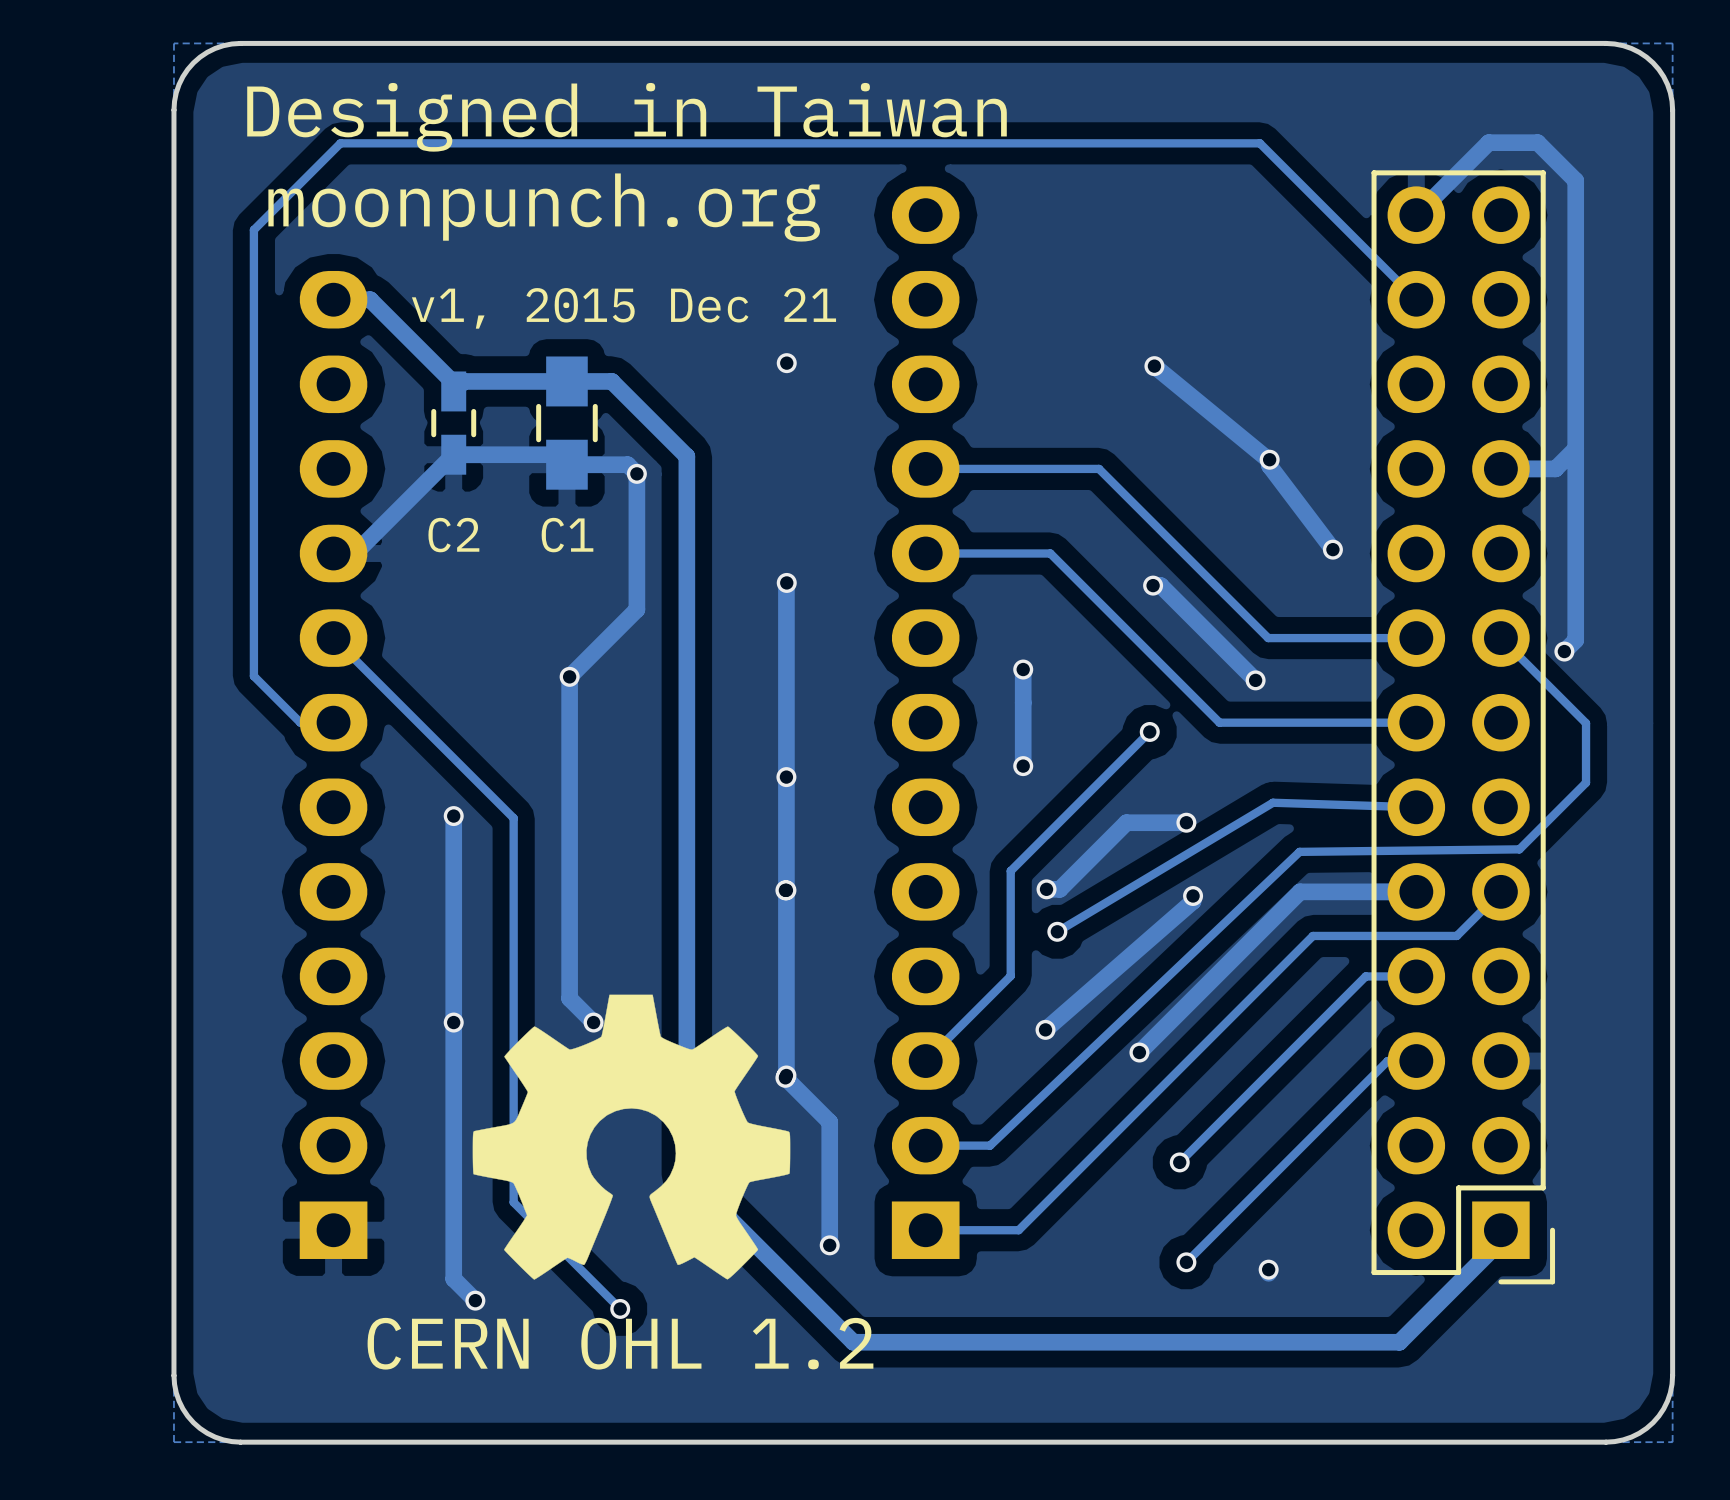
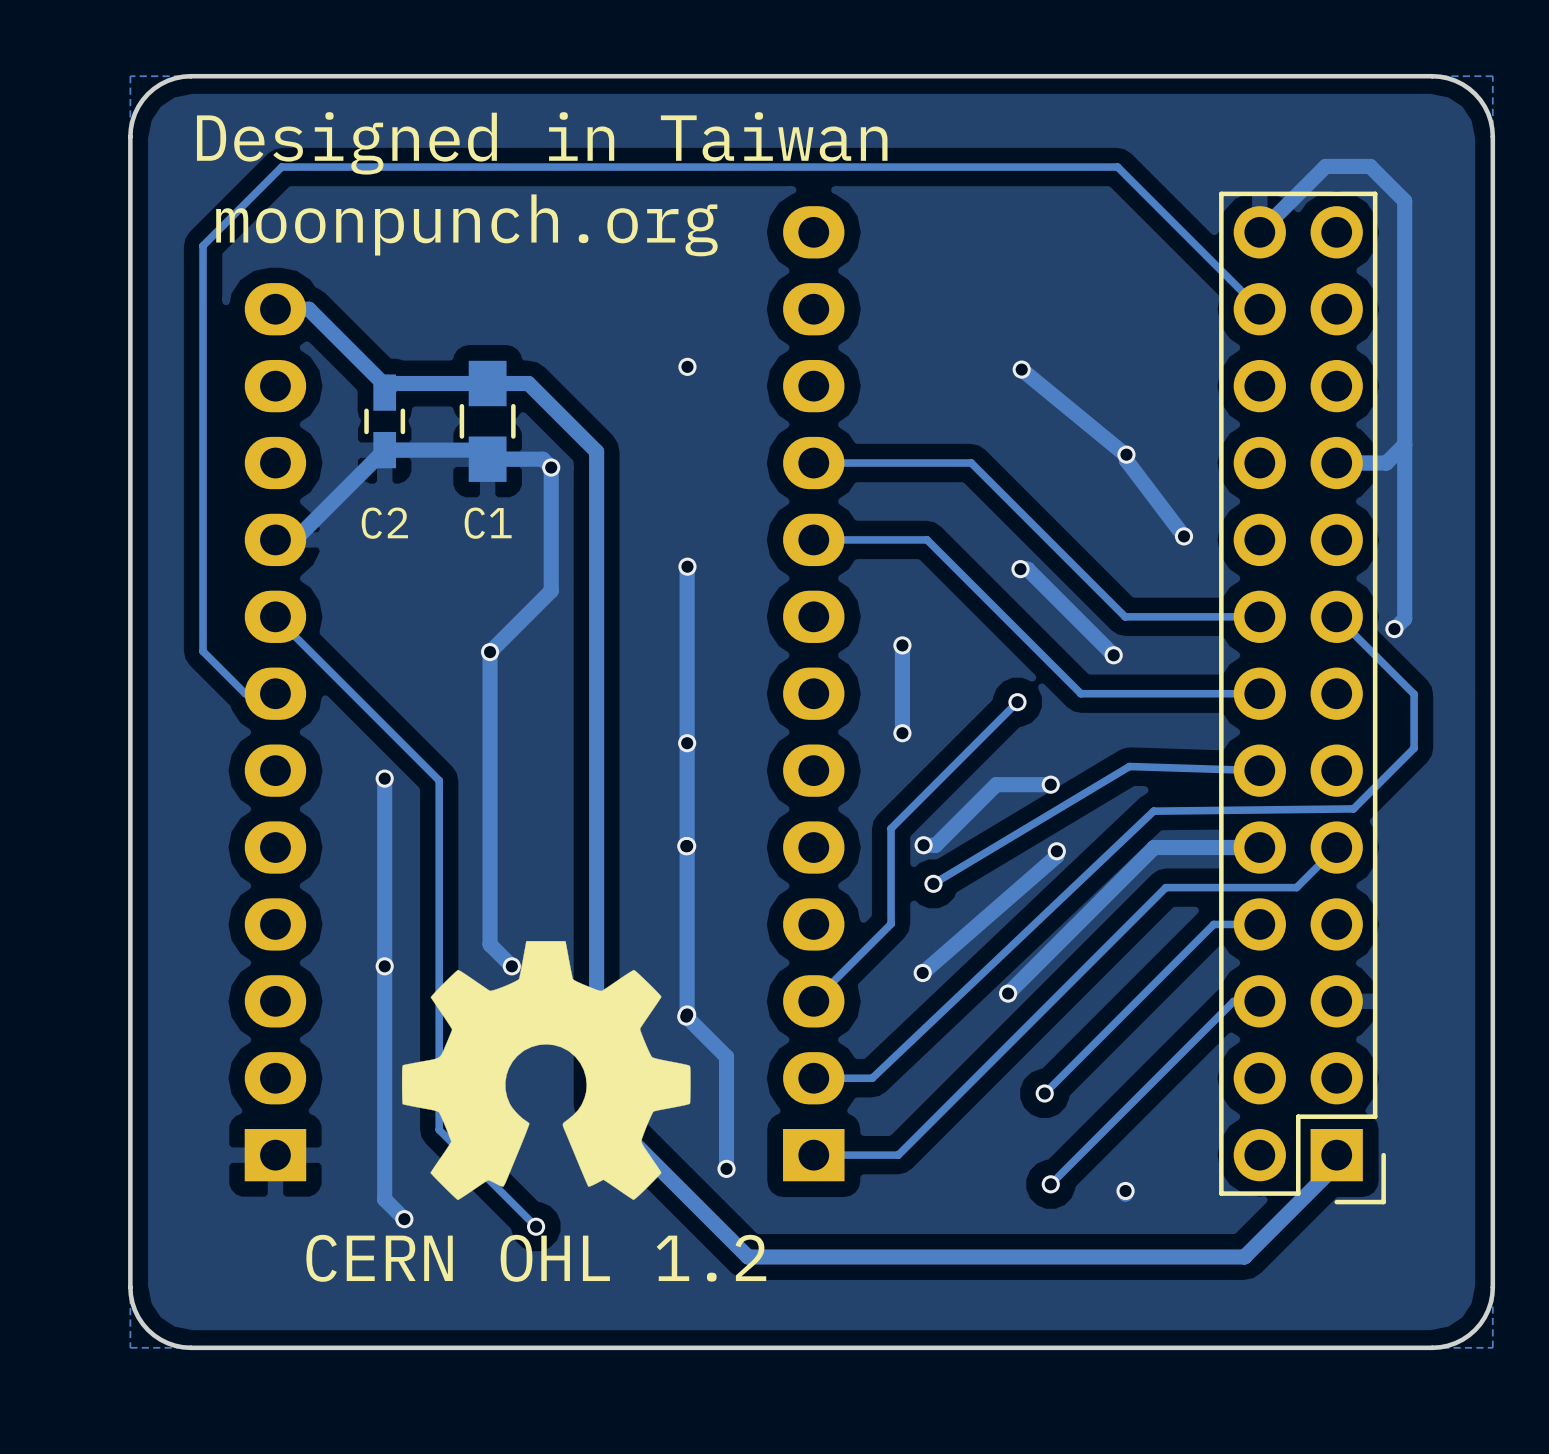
text: v1, 2015 Dec 21 (623, 308) -> none

